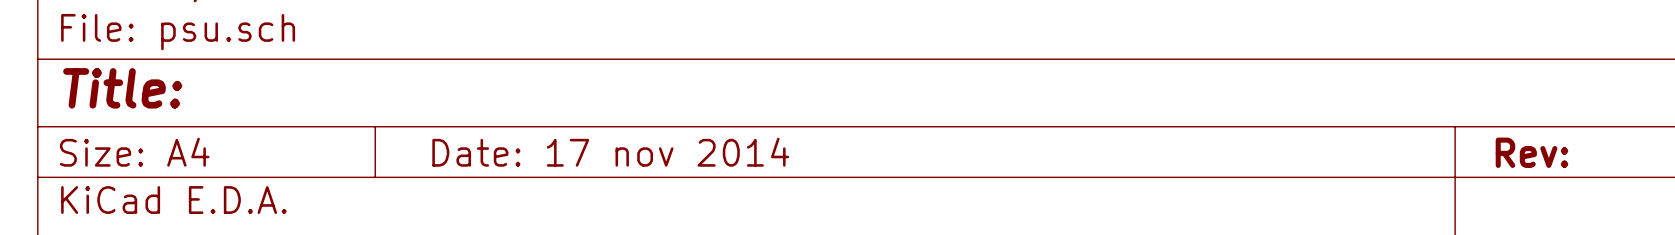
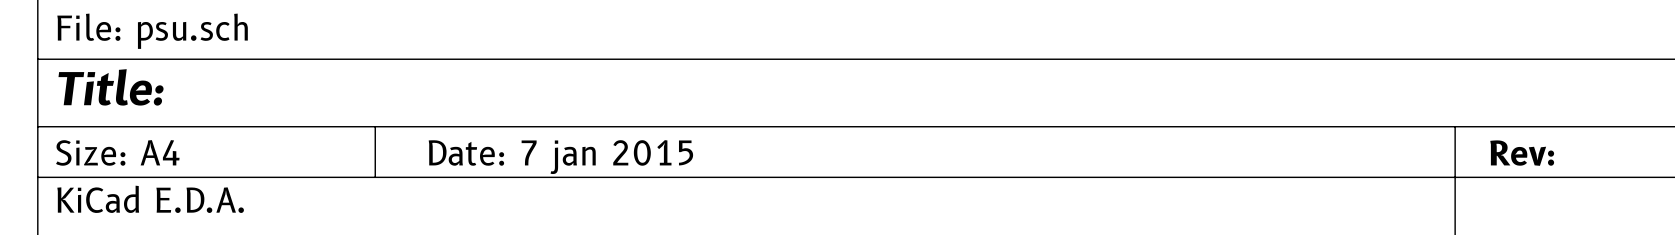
title block: Date: 17 nov 2014 (610, 152) -> Date: 7 jan 2015 (560, 157)

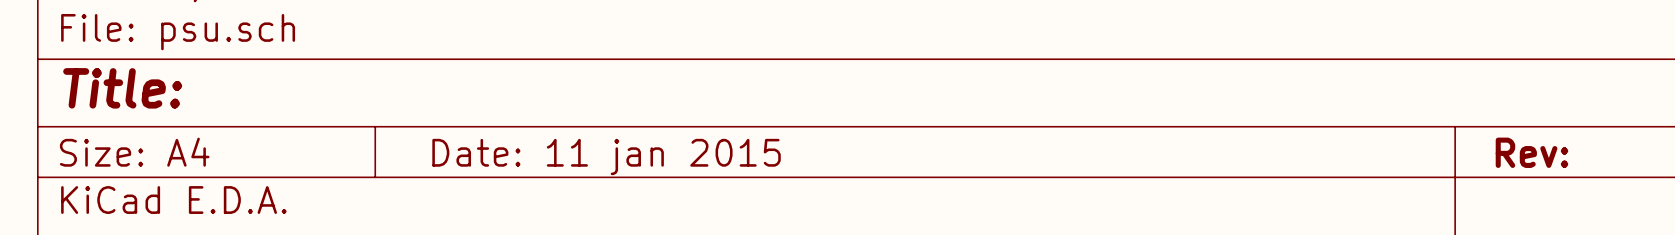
title block: Date: 7 jan 2015 (560, 157) -> Date: 11 jan 2015 (606, 156)

